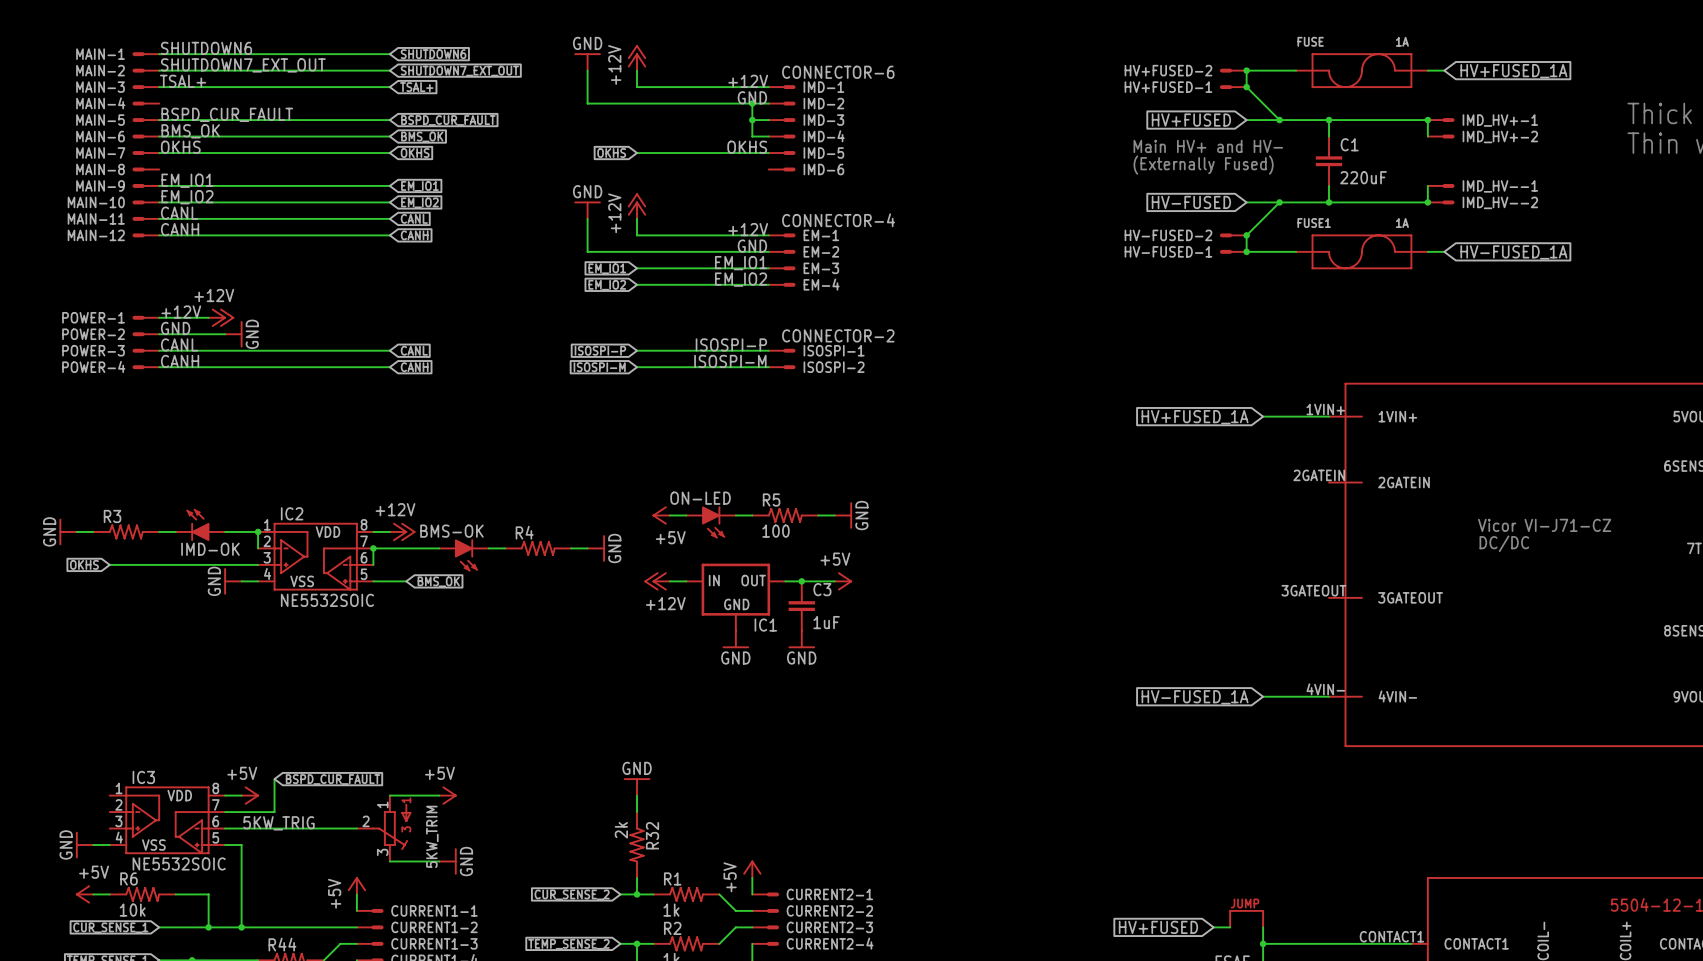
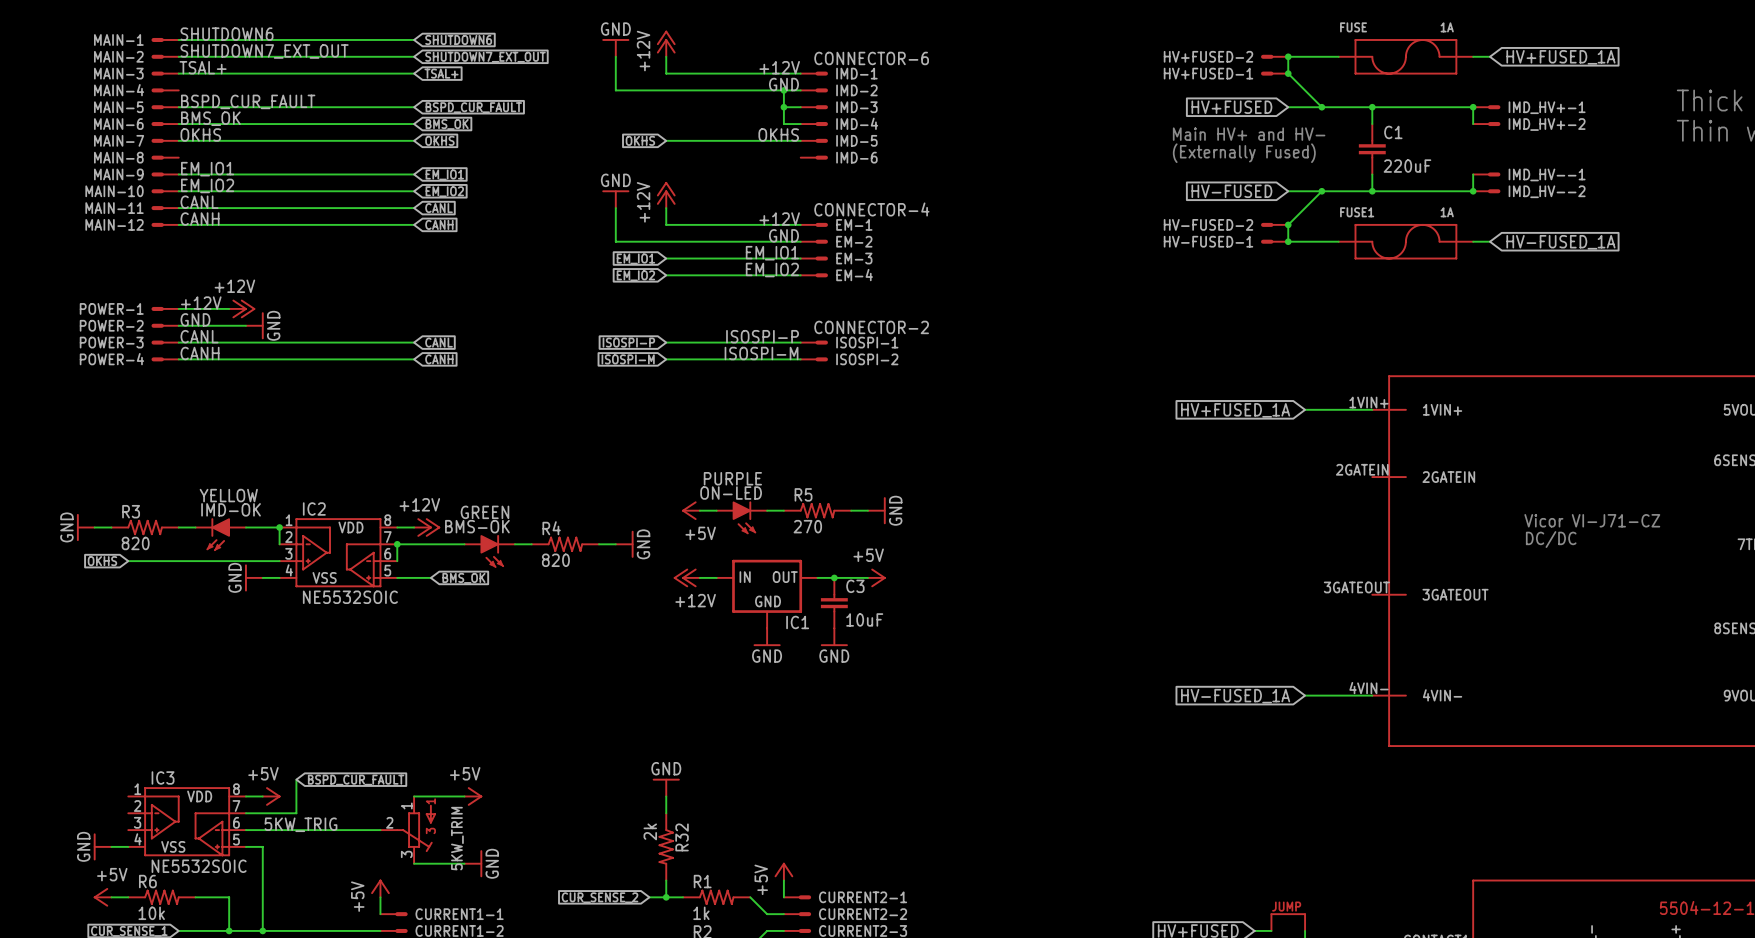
ON-LED value: none -> PURPLE (732, 478)
BMS-OK value: none -> GREEN (484, 512)
IMD-OK: (200, 525) -> none
R5 value: 100 (776, 531) -> 270 (807, 526)
IMD-OK: none -> YELLOW (220, 534)
R3 value: none -> 820 (135, 543)
R4 value: none -> 820 (555, 560)
C3 value: 1uF (826, 622) -> 10uF (864, 619)

